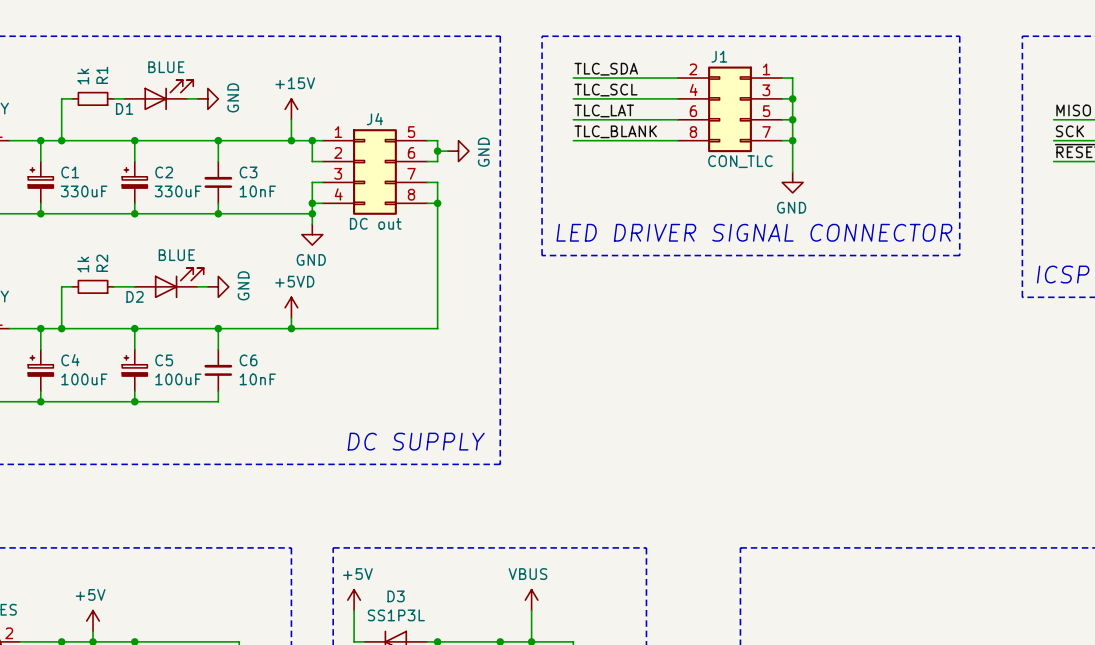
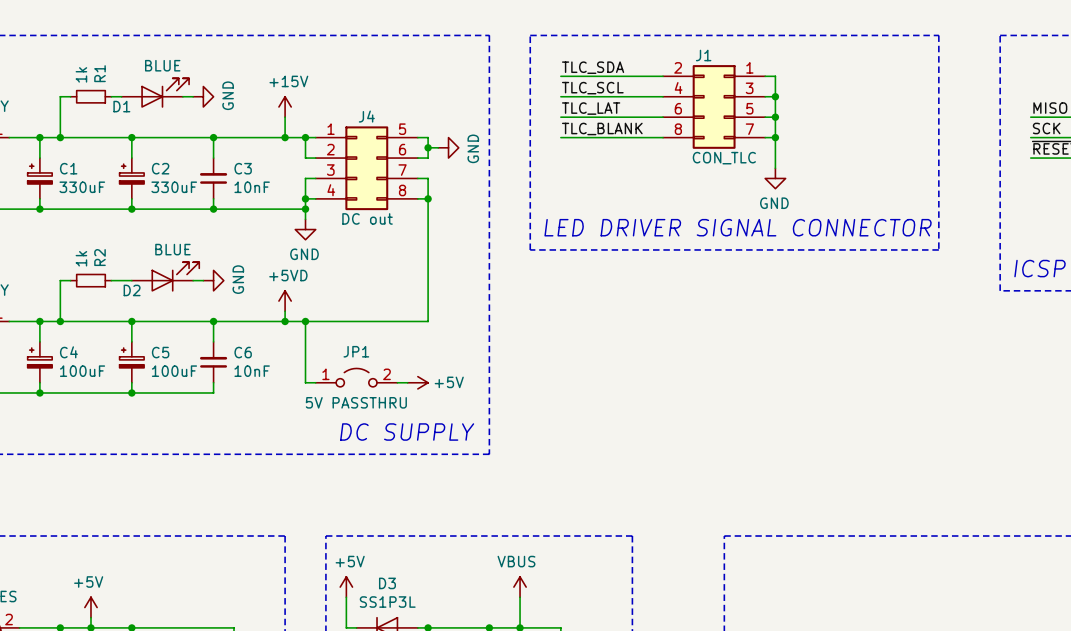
wire: none -> (305, 321) (305, 382) (315, 382)
junction: none -> (305, 321)
JP1: none -> 5V PASSTHRU (356, 377)
wire: none -> (397, 382) (407, 382)
power symbol: none -> +5V (417, 382)

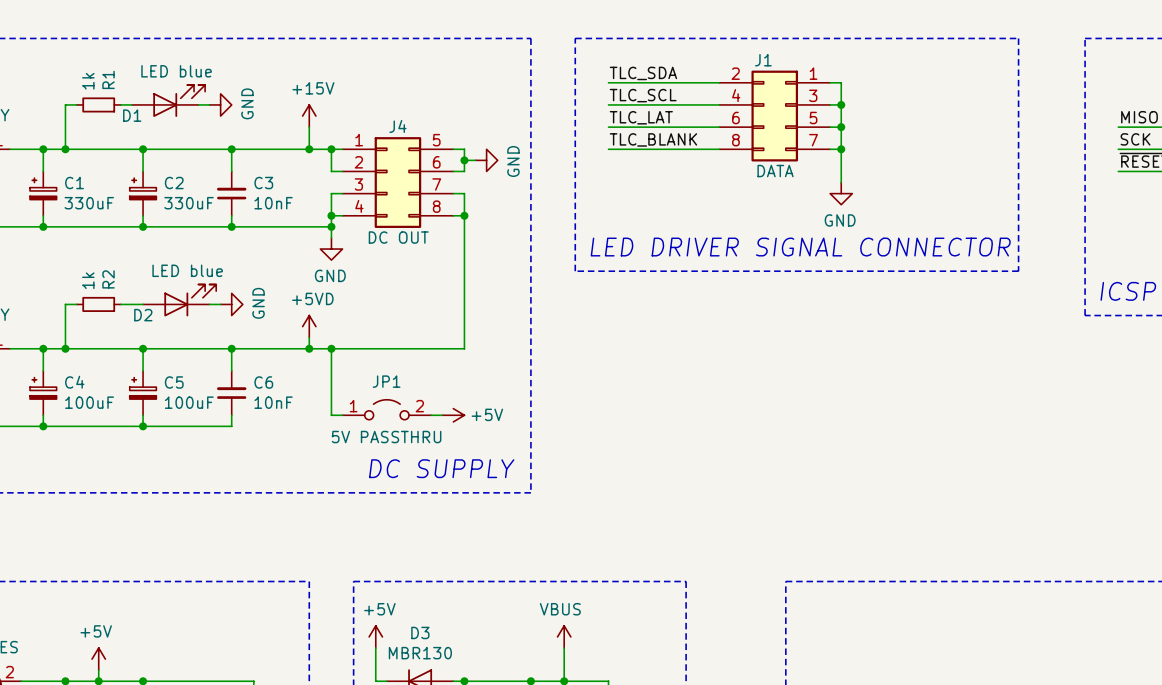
D1 value: BLUE (162, 65) -> LED blue (176, 71)
J1 value: CON_TLC (724, 158) -> DATA (775, 171)
J4 value: DC out (367, 218) -> DC OUT (398, 237)
D2 value: BLUE (172, 249) -> LED blue (187, 270)
D3 value: SS1P3L (387, 602) -> MBR130 (420, 653)

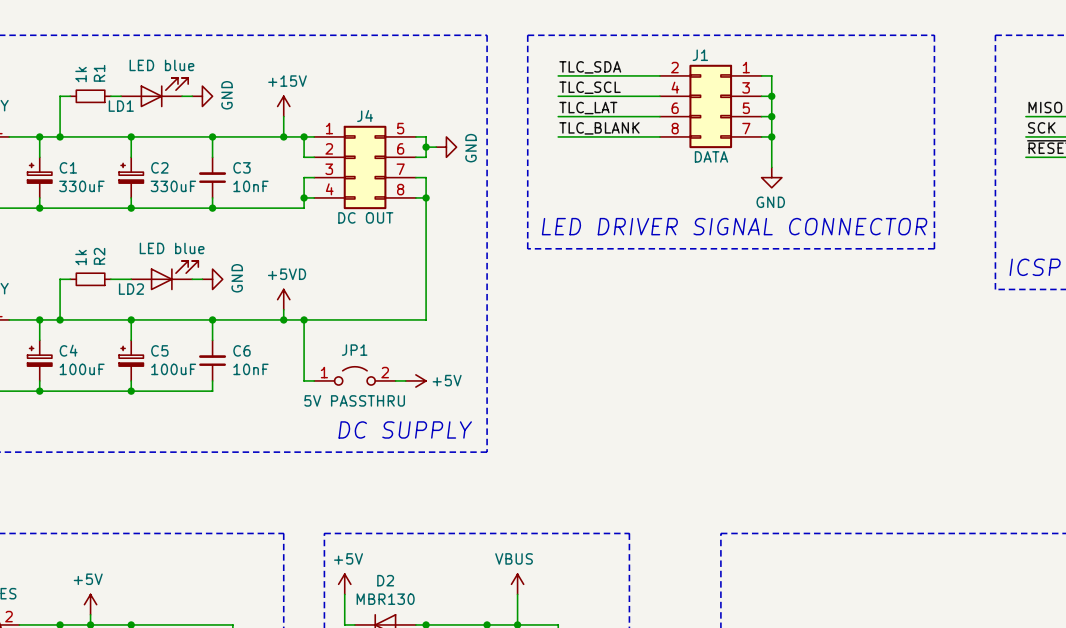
D1 name: D1 (132, 115) -> LD1 (121, 106)
wire: (331, 226) (331, 237) -> none
junction: (331, 226) -> none
power symbol: GND (331, 249) -> none
D2 name: D2 (143, 315) -> LD2 (131, 289)
D3 name: D3 (420, 632) -> D2 (385, 580)

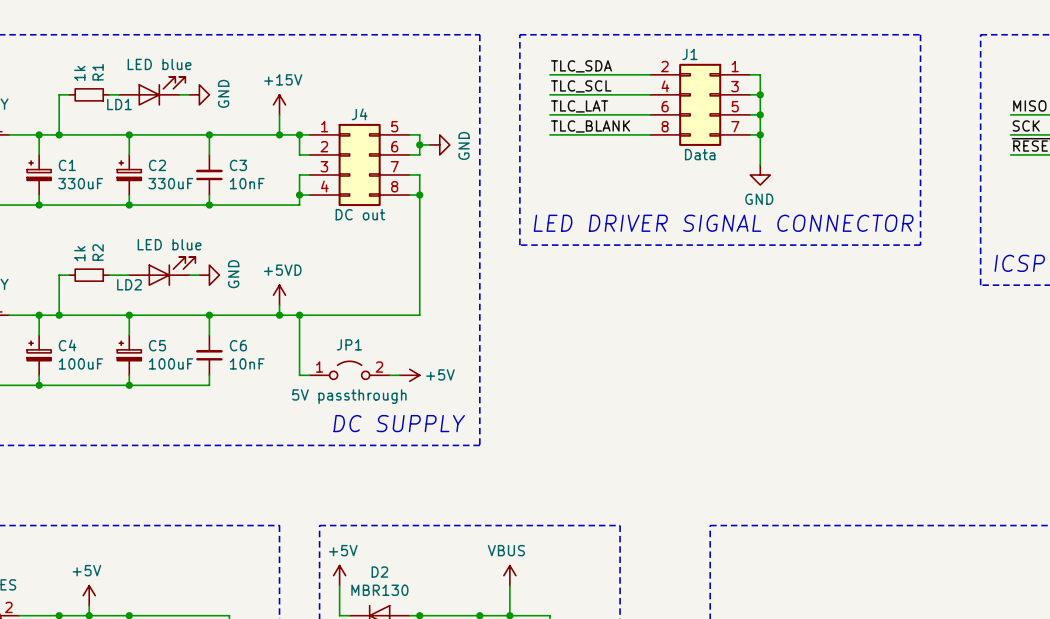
J1 text: none -> Data (700, 154)
J1 value: DATA (711, 156) -> none
J4 text: none -> DC out (360, 214)
J4 value: DC OUT (365, 217) -> none
JP1 value: 5V PASSTHRU (354, 400) -> none
JP1 text: none -> 5V passthrough (349, 396)

